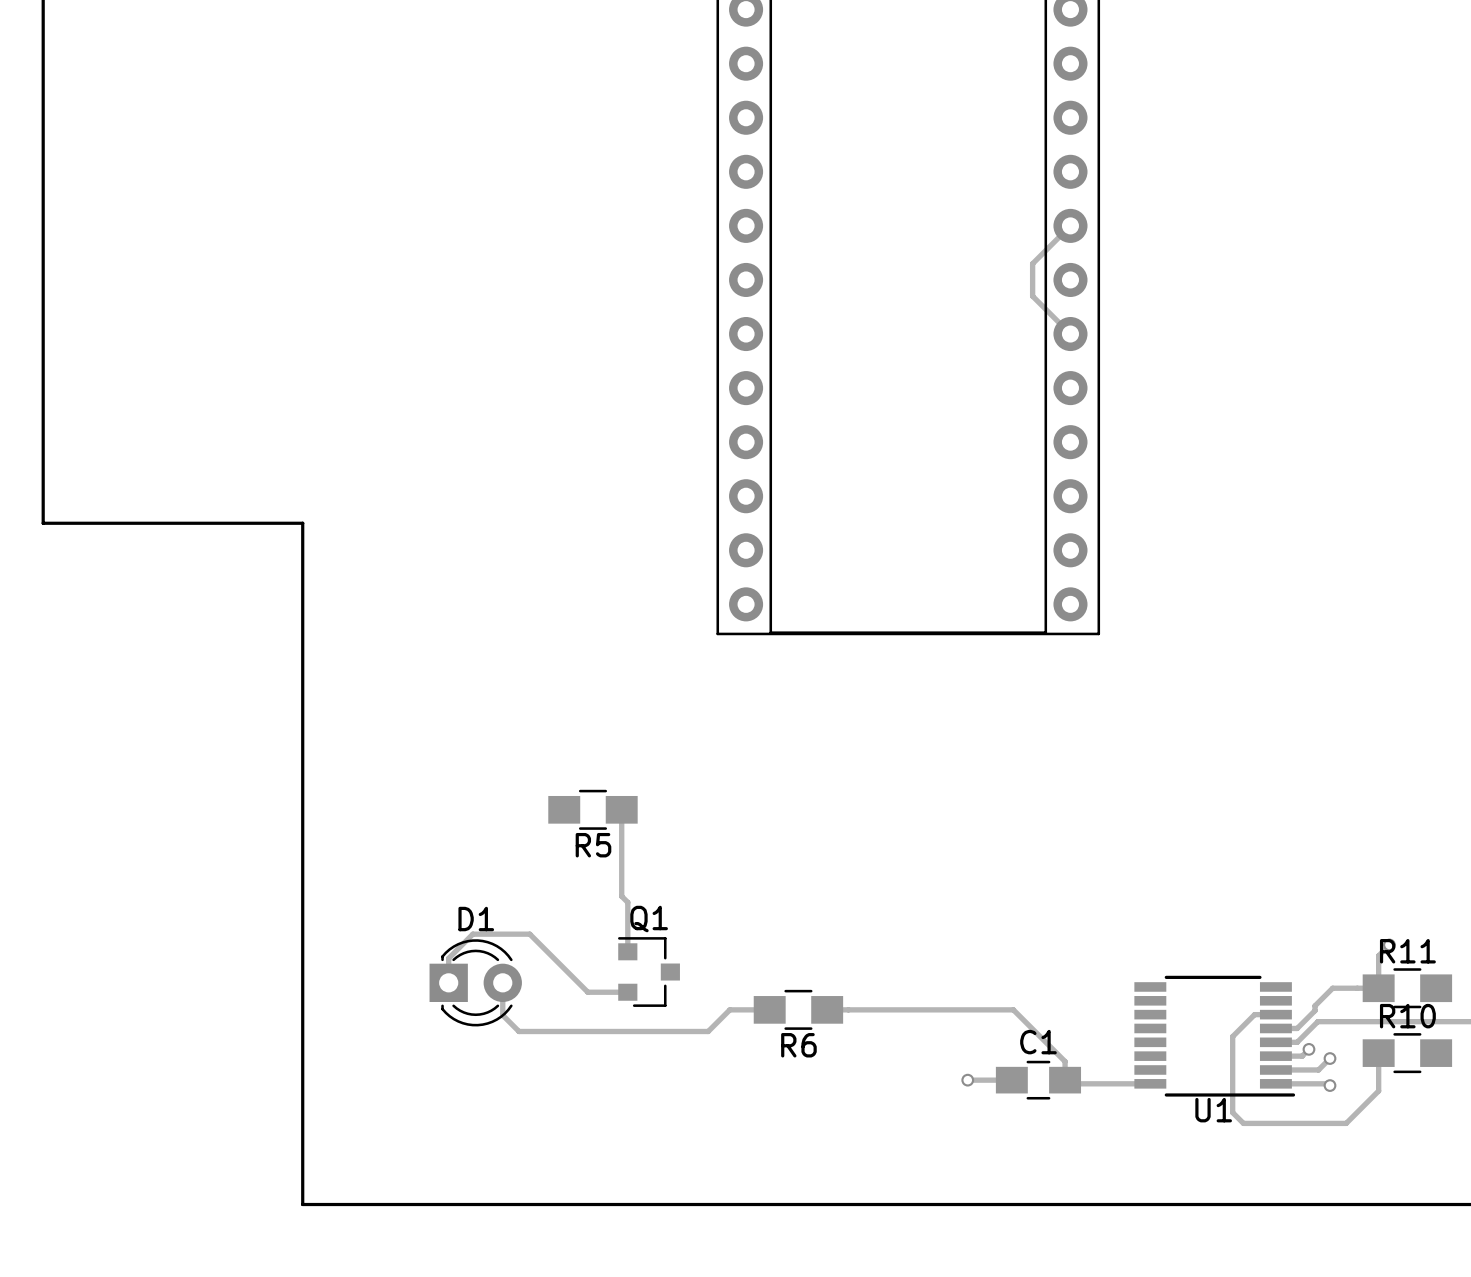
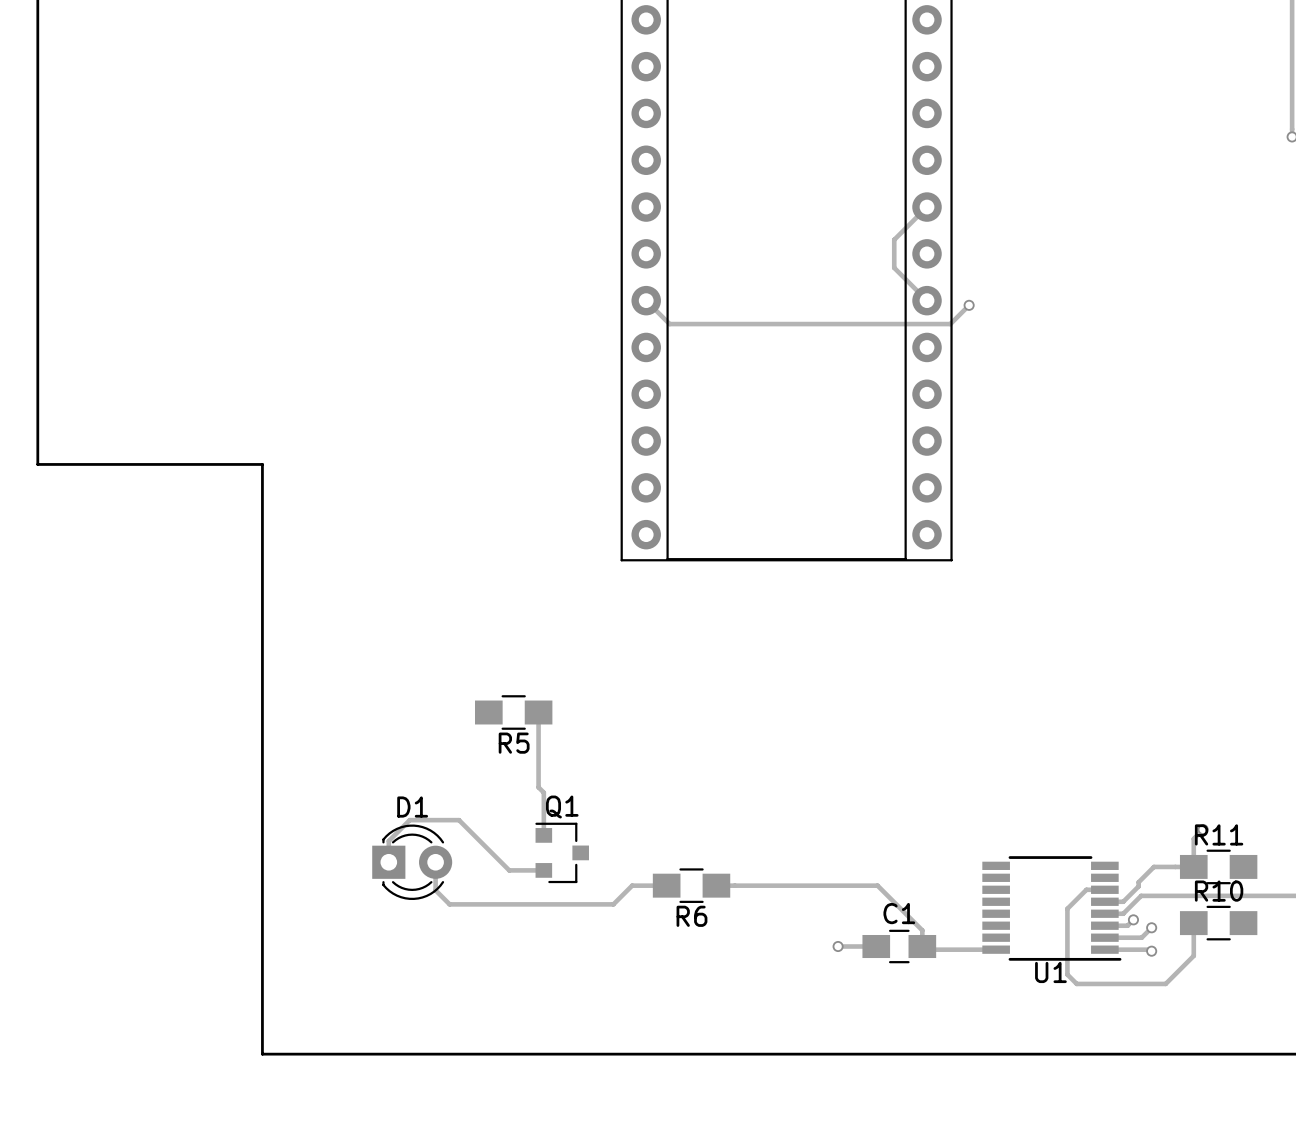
track: none -> (646, 300) (669, 324) (950, 324) (969, 305)
via: none -> (969, 305)

